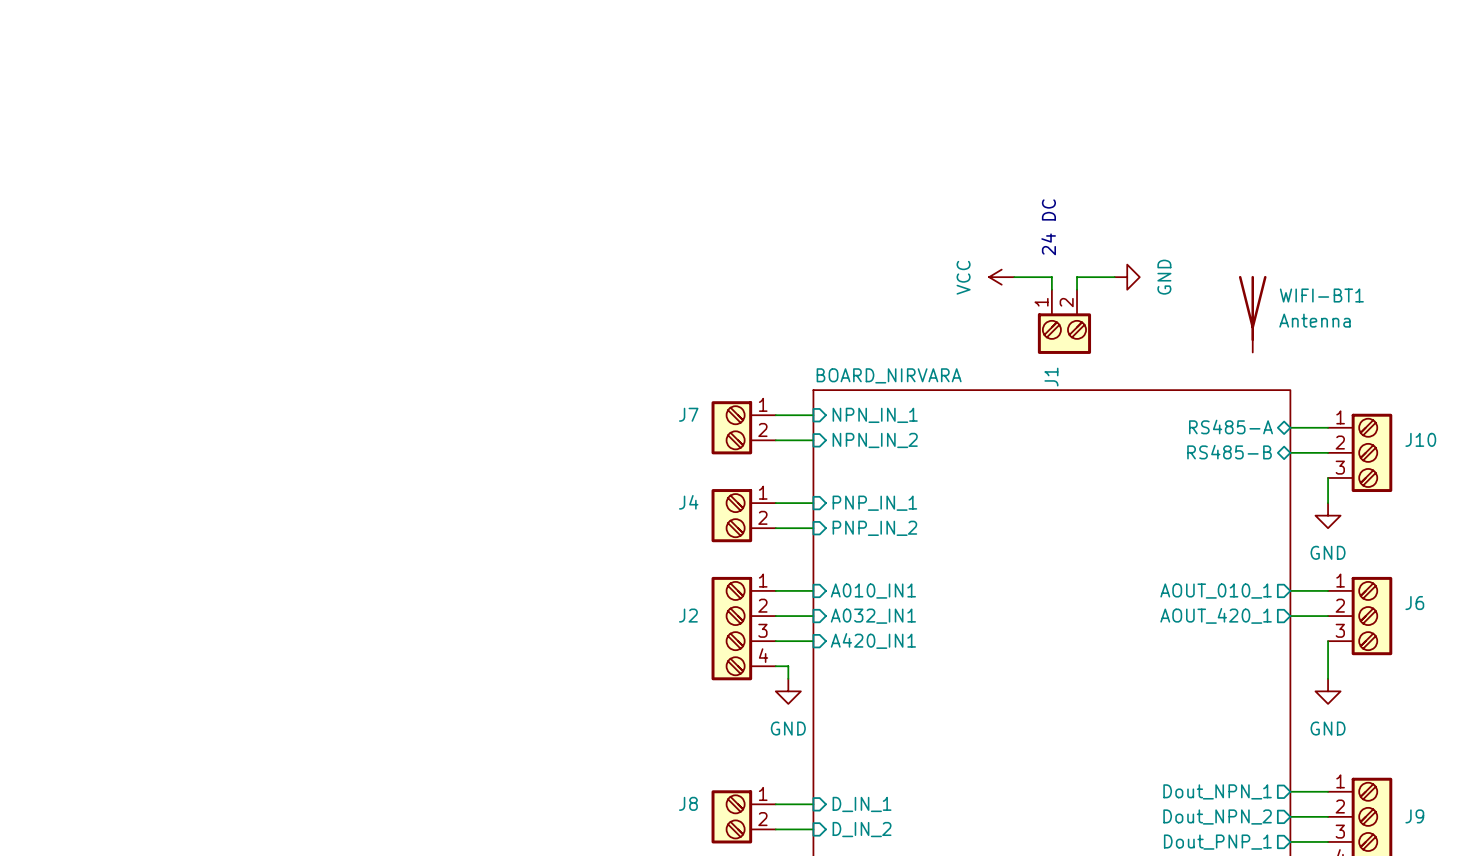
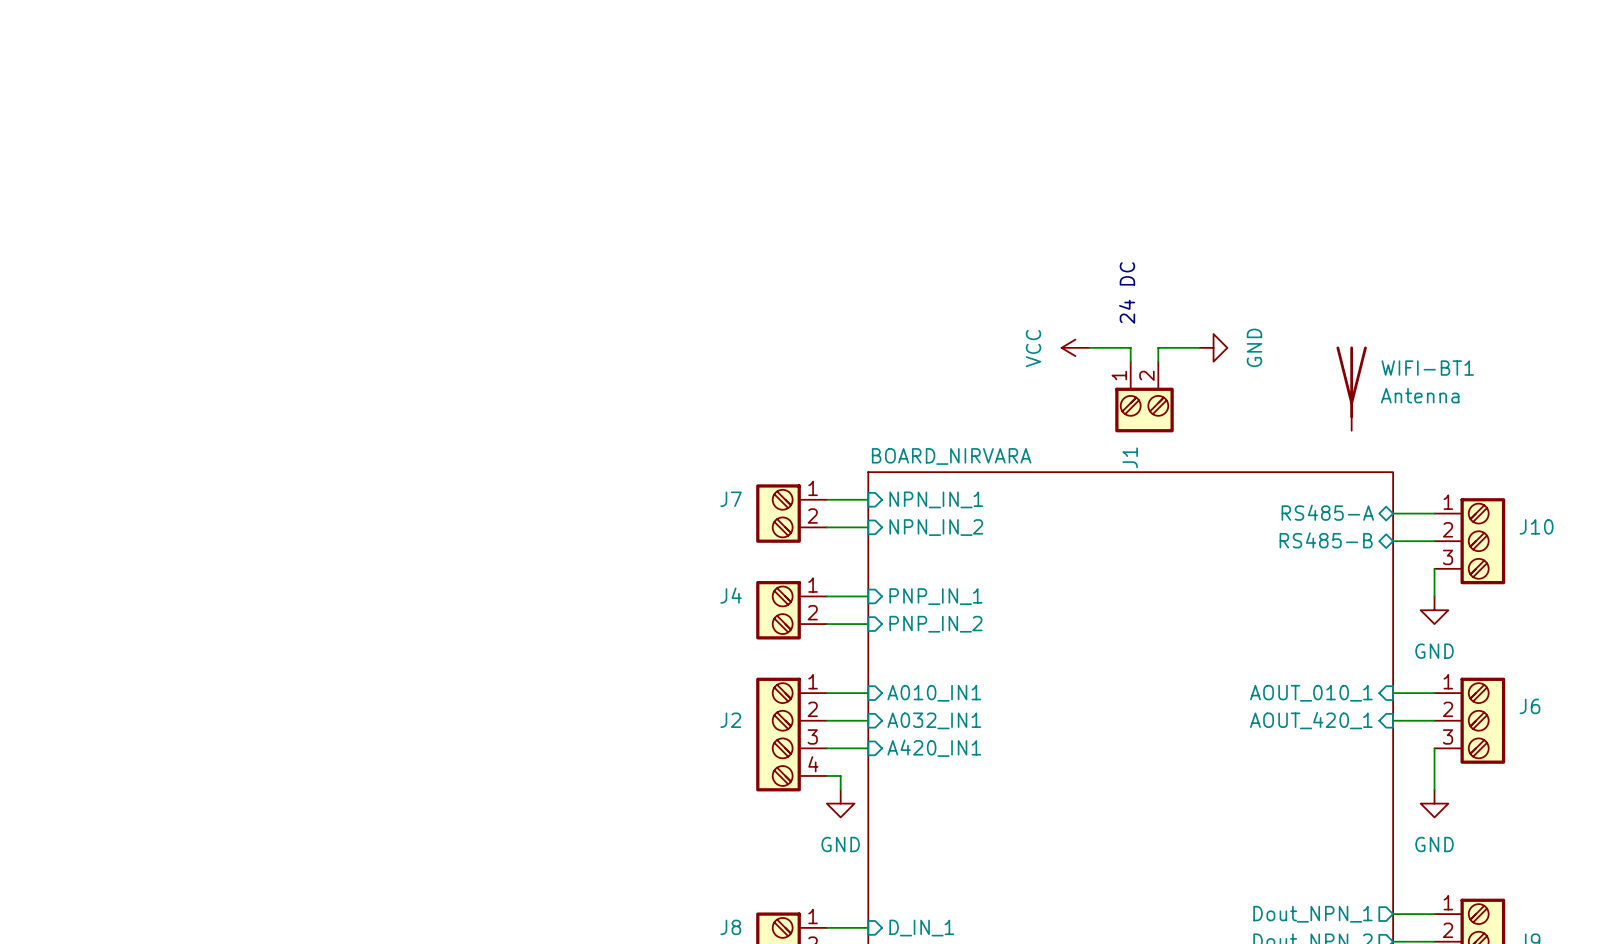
sheet pin shape: output (1216, 591) -> input (1311, 693)
sheet pin shape: output (1216, 615) -> input (1311, 720)

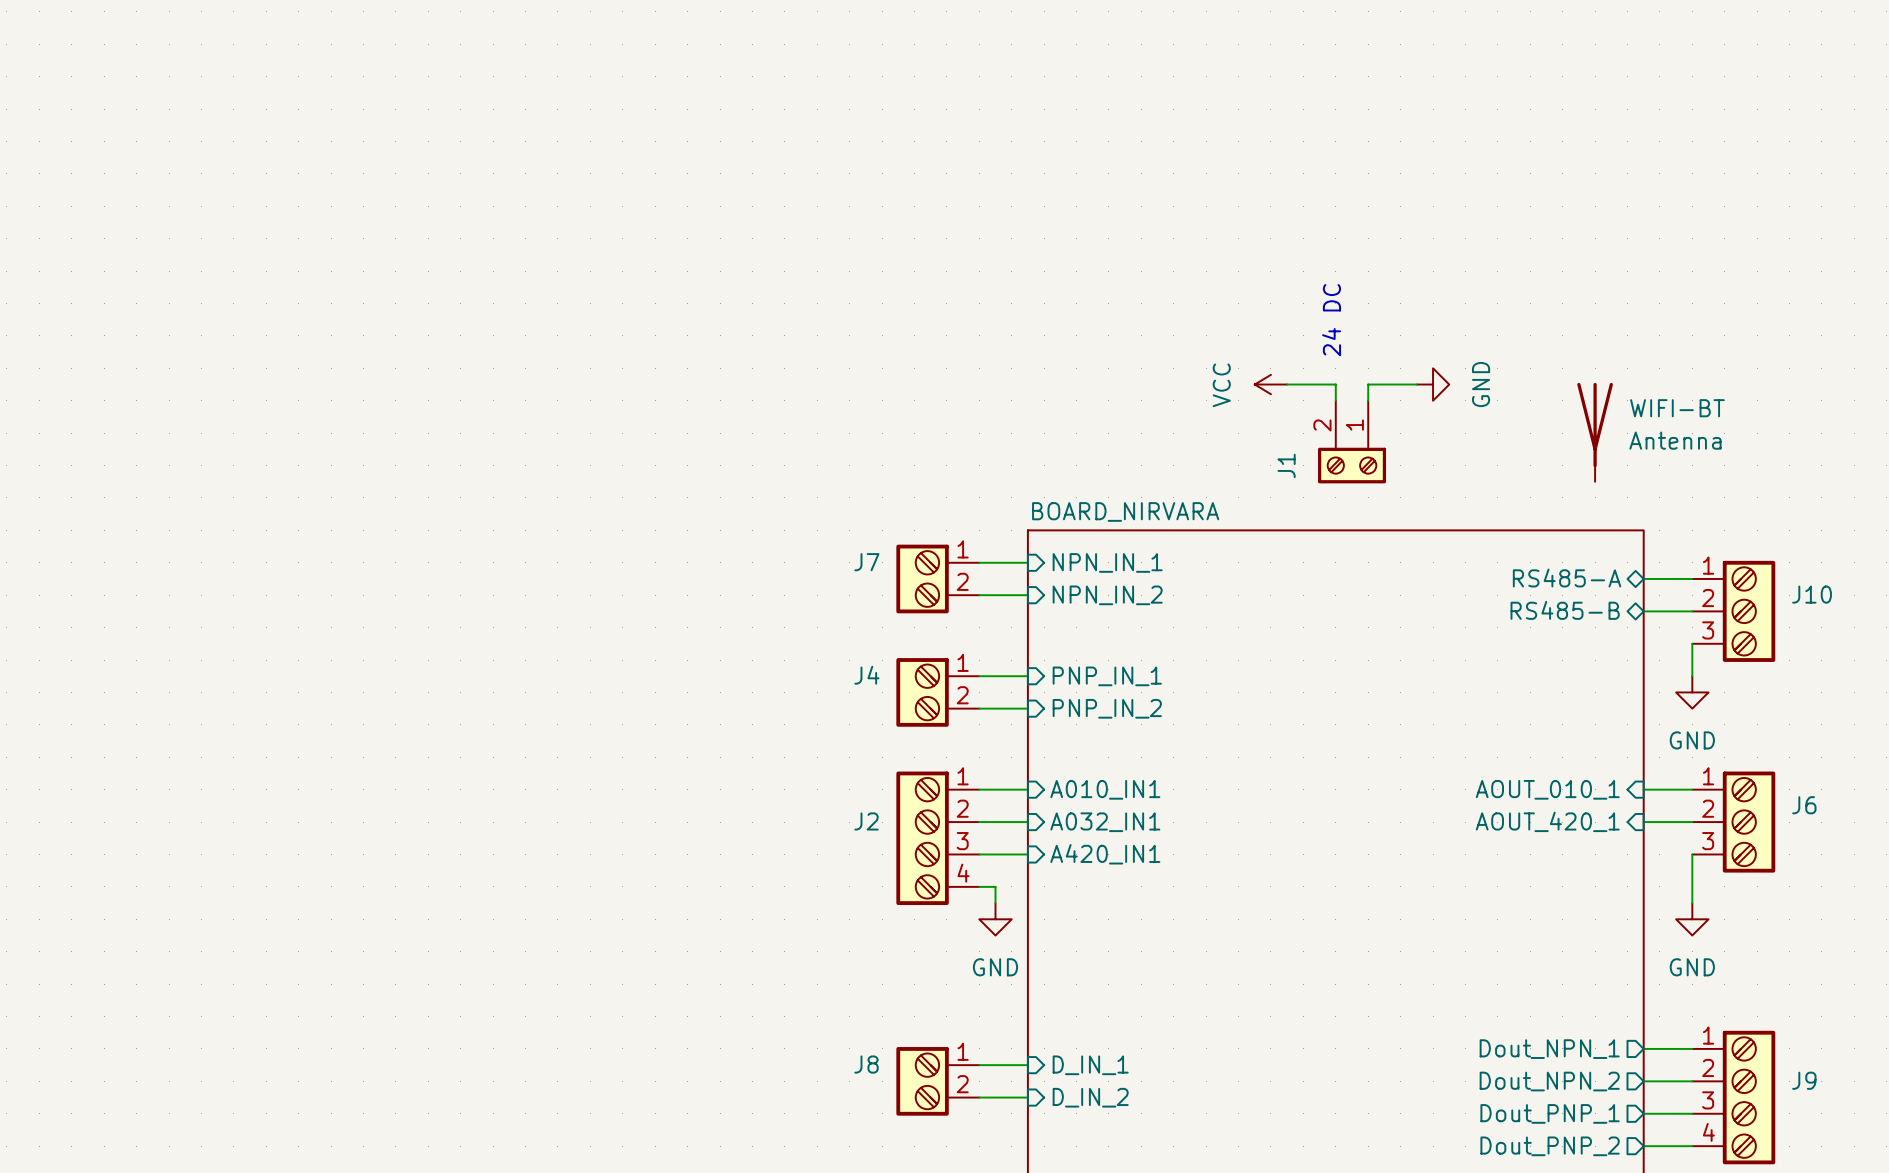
J1 symbol: [1115, 361, 1174, 433] -> [1317, 400, 1387, 484]
WIFI-BT1 name: WIFI-BT1 (1427, 368) -> WIFI-BT (1677, 408)
J1 name position: J1 (1130, 457) -> J1 (1286, 465)

